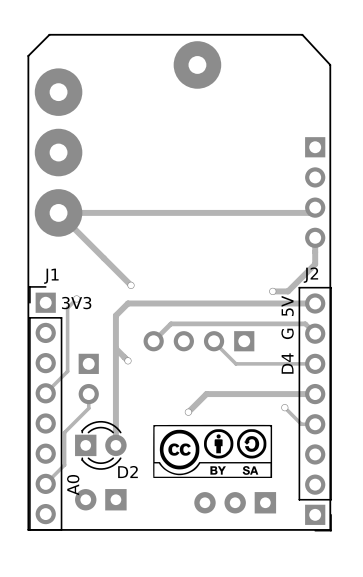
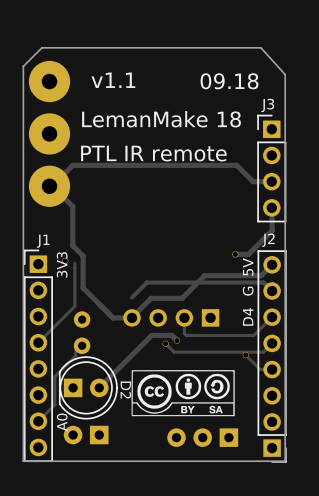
part: (197, 64) -> none
board edge: (28, 74) (28, 55) (49, 34) (302, 34) (330, 64) (330, 84) -> (23, 66) (41, 47) (260, 47) (285, 74)
text: none -> v1.1 (113, 80)
text: none -> 09.18 (229, 81)
text: none -> LemanMake 18 (161, 119)
text: none -> PTL IR remote (153, 153)
J3 side: top (315, 192) -> bottom (271, 168)
track: (315, 207) (309, 212) (58, 212) (131, 285) -> (271, 181) (253, 181) (236, 165) (72, 165) (52, 185) (72, 206) (72, 245) (83, 256) (83, 288) (113, 317) (132, 317) (151, 298) (182, 298) (204, 275) (261, 275) (272, 264)
via: (131, 285) -> none
track: (76, 298) (67, 308) (67, 371) -> (74, 263) (74, 306) (57, 323)
text rotation: 0° (76, 303) -> 90° counterclockwise (62, 264)
track: (315, 303) (128, 303) (115, 315) (115, 445) -> (176, 340) (171, 335) (151, 335) (99, 387)
part position: (198, 341) -> (171, 317)
track: (214, 341) (235, 363) (315, 363) -> (184, 317) (184, 333) (186, 335) (253, 335) (272, 317)
part footprint: [78, 353, 99, 405] -> [73, 311, 91, 355]
via: (128, 360) -> none
via: none -> (176, 340)
via: none -> (165, 343)
track: (315, 394) (206, 394) (188, 412) -> (272, 343) (263, 352) (174, 352) (165, 343)
via: (188, 412) -> none
D2 footprint: [75, 421, 127, 470] -> [59, 356, 118, 420]
D2 name position: D2 (127, 472) -> D2 (125, 390)

